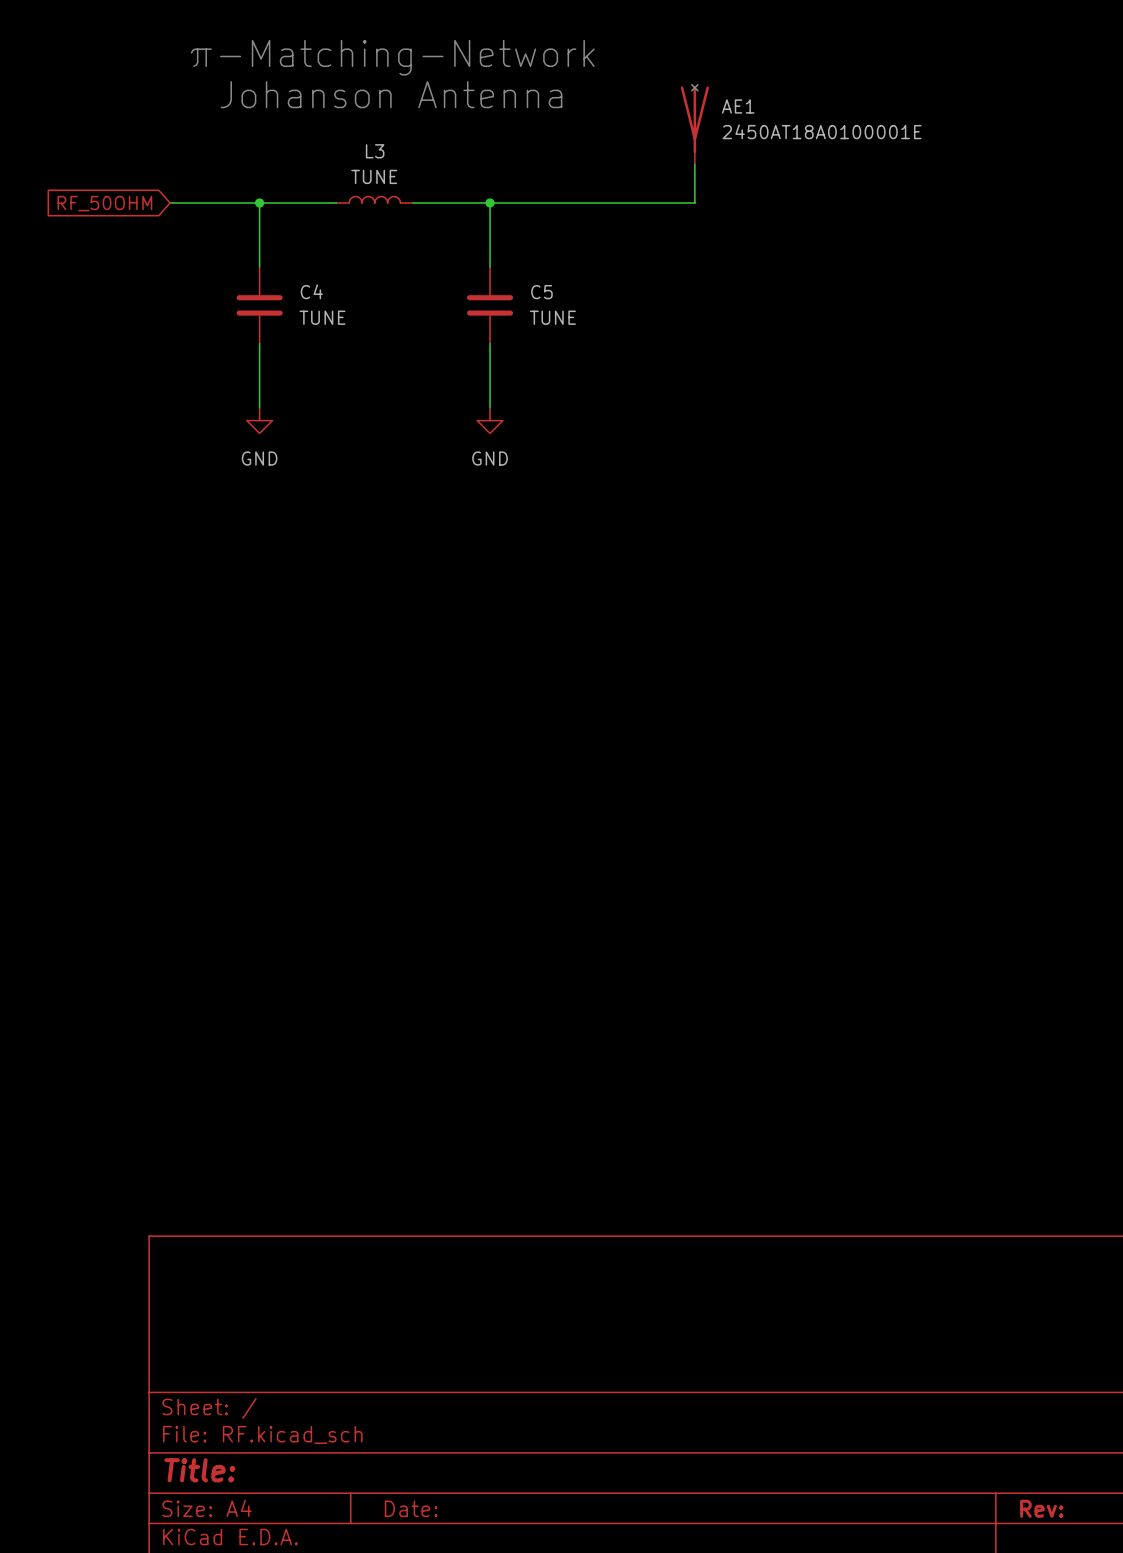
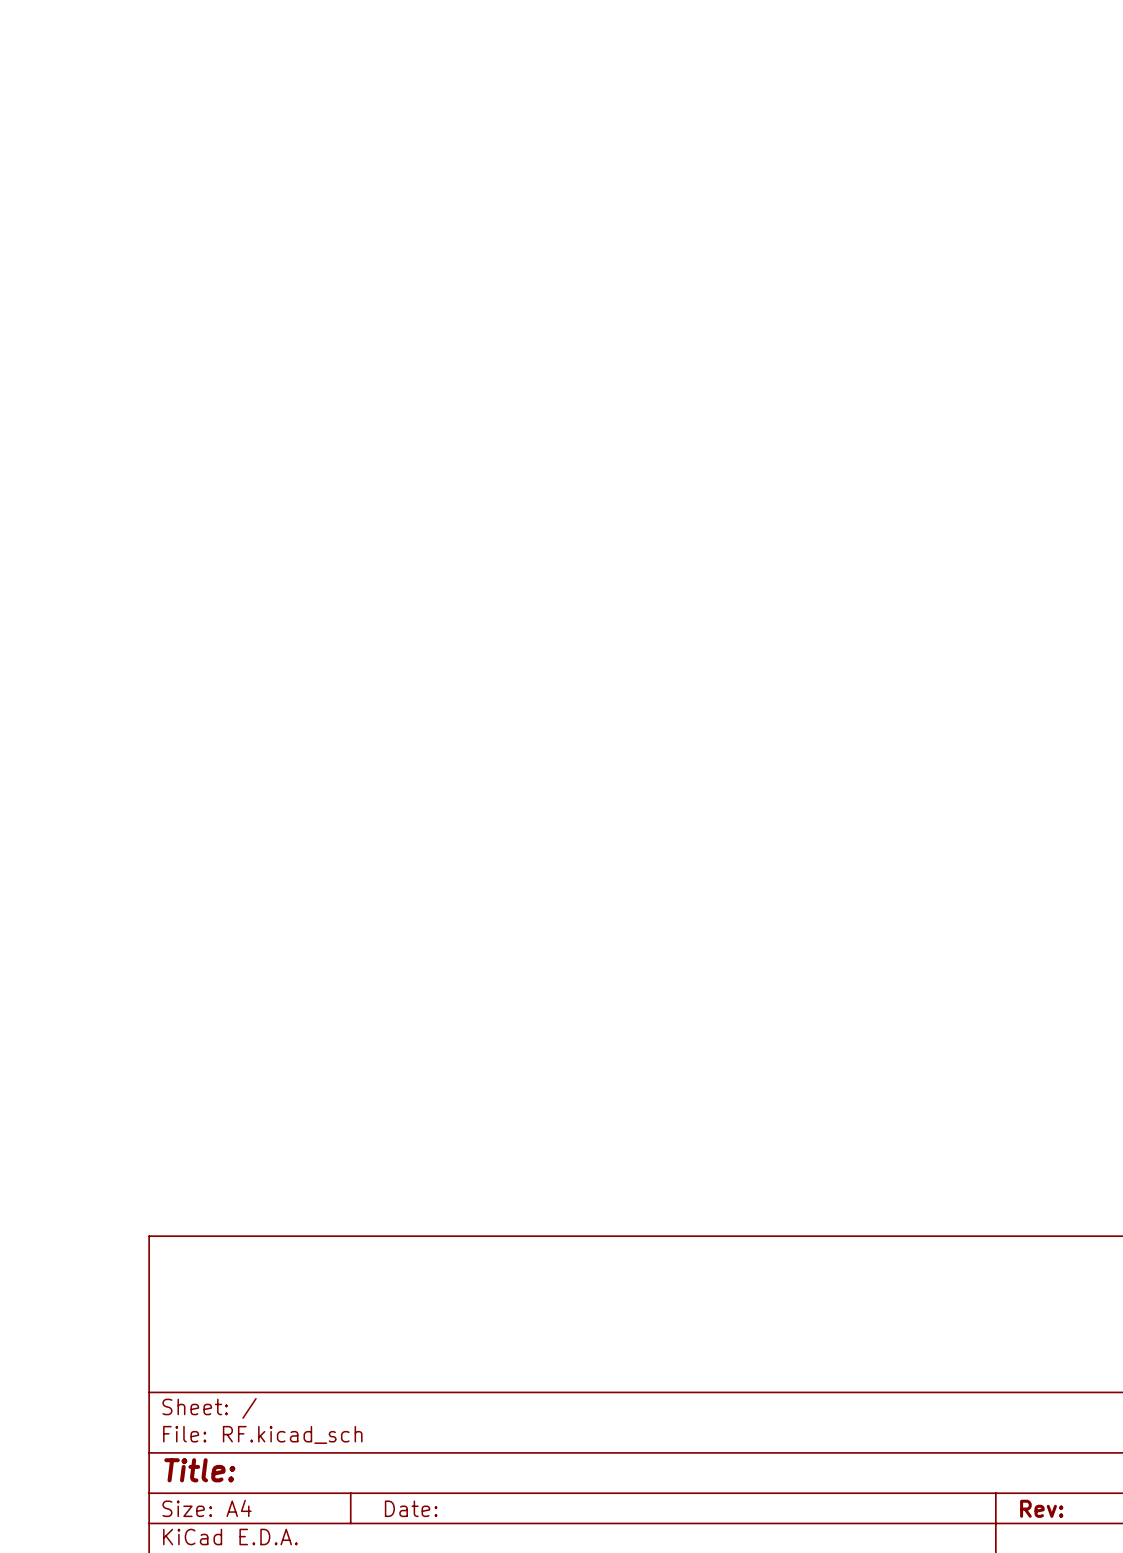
text: π-Matching-Network (392, 57) -> none
text: Johanson Antenna (391, 94) -> none
AE1: 2450AT18A0100001E (694, 124) -> none
wire: (694, 164) (694, 202) (413, 202) -> none
L3: TUNE (374, 199) -> none
wire: (170, 202) (336, 202) -> none
wire: (259, 202) (259, 266) -> none
junction: (259, 202) -> none
wire: (490, 202) (490, 266) -> none
junction: (490, 202) -> none
global label: RF_50OHM (104, 203) -> none
C4: TUNE (259, 305) -> none
C5: TUNE (490, 305) -> none
wire: (259, 343) (259, 407) -> none
wire: (490, 343) (490, 407) -> none
power symbol: GND (259, 420) -> none
power symbol: GND (490, 420) -> none

